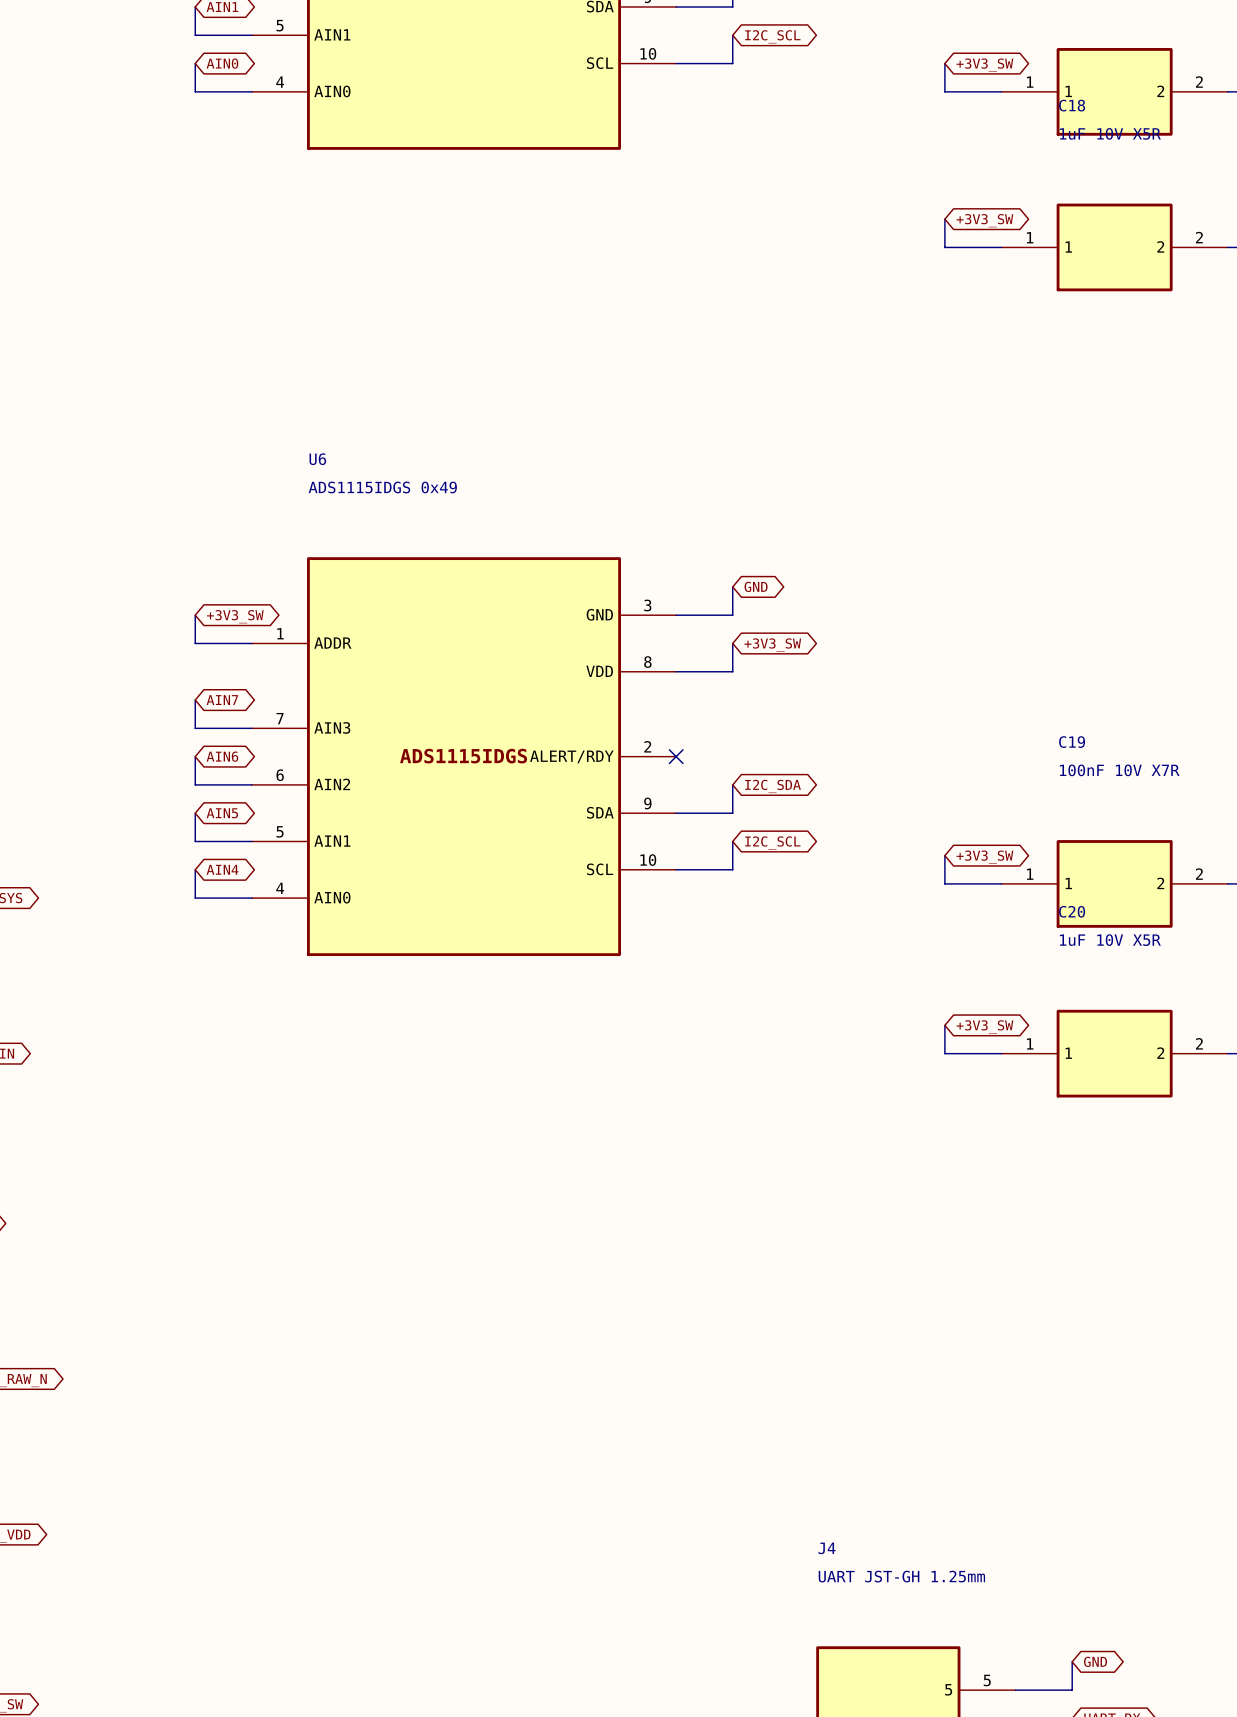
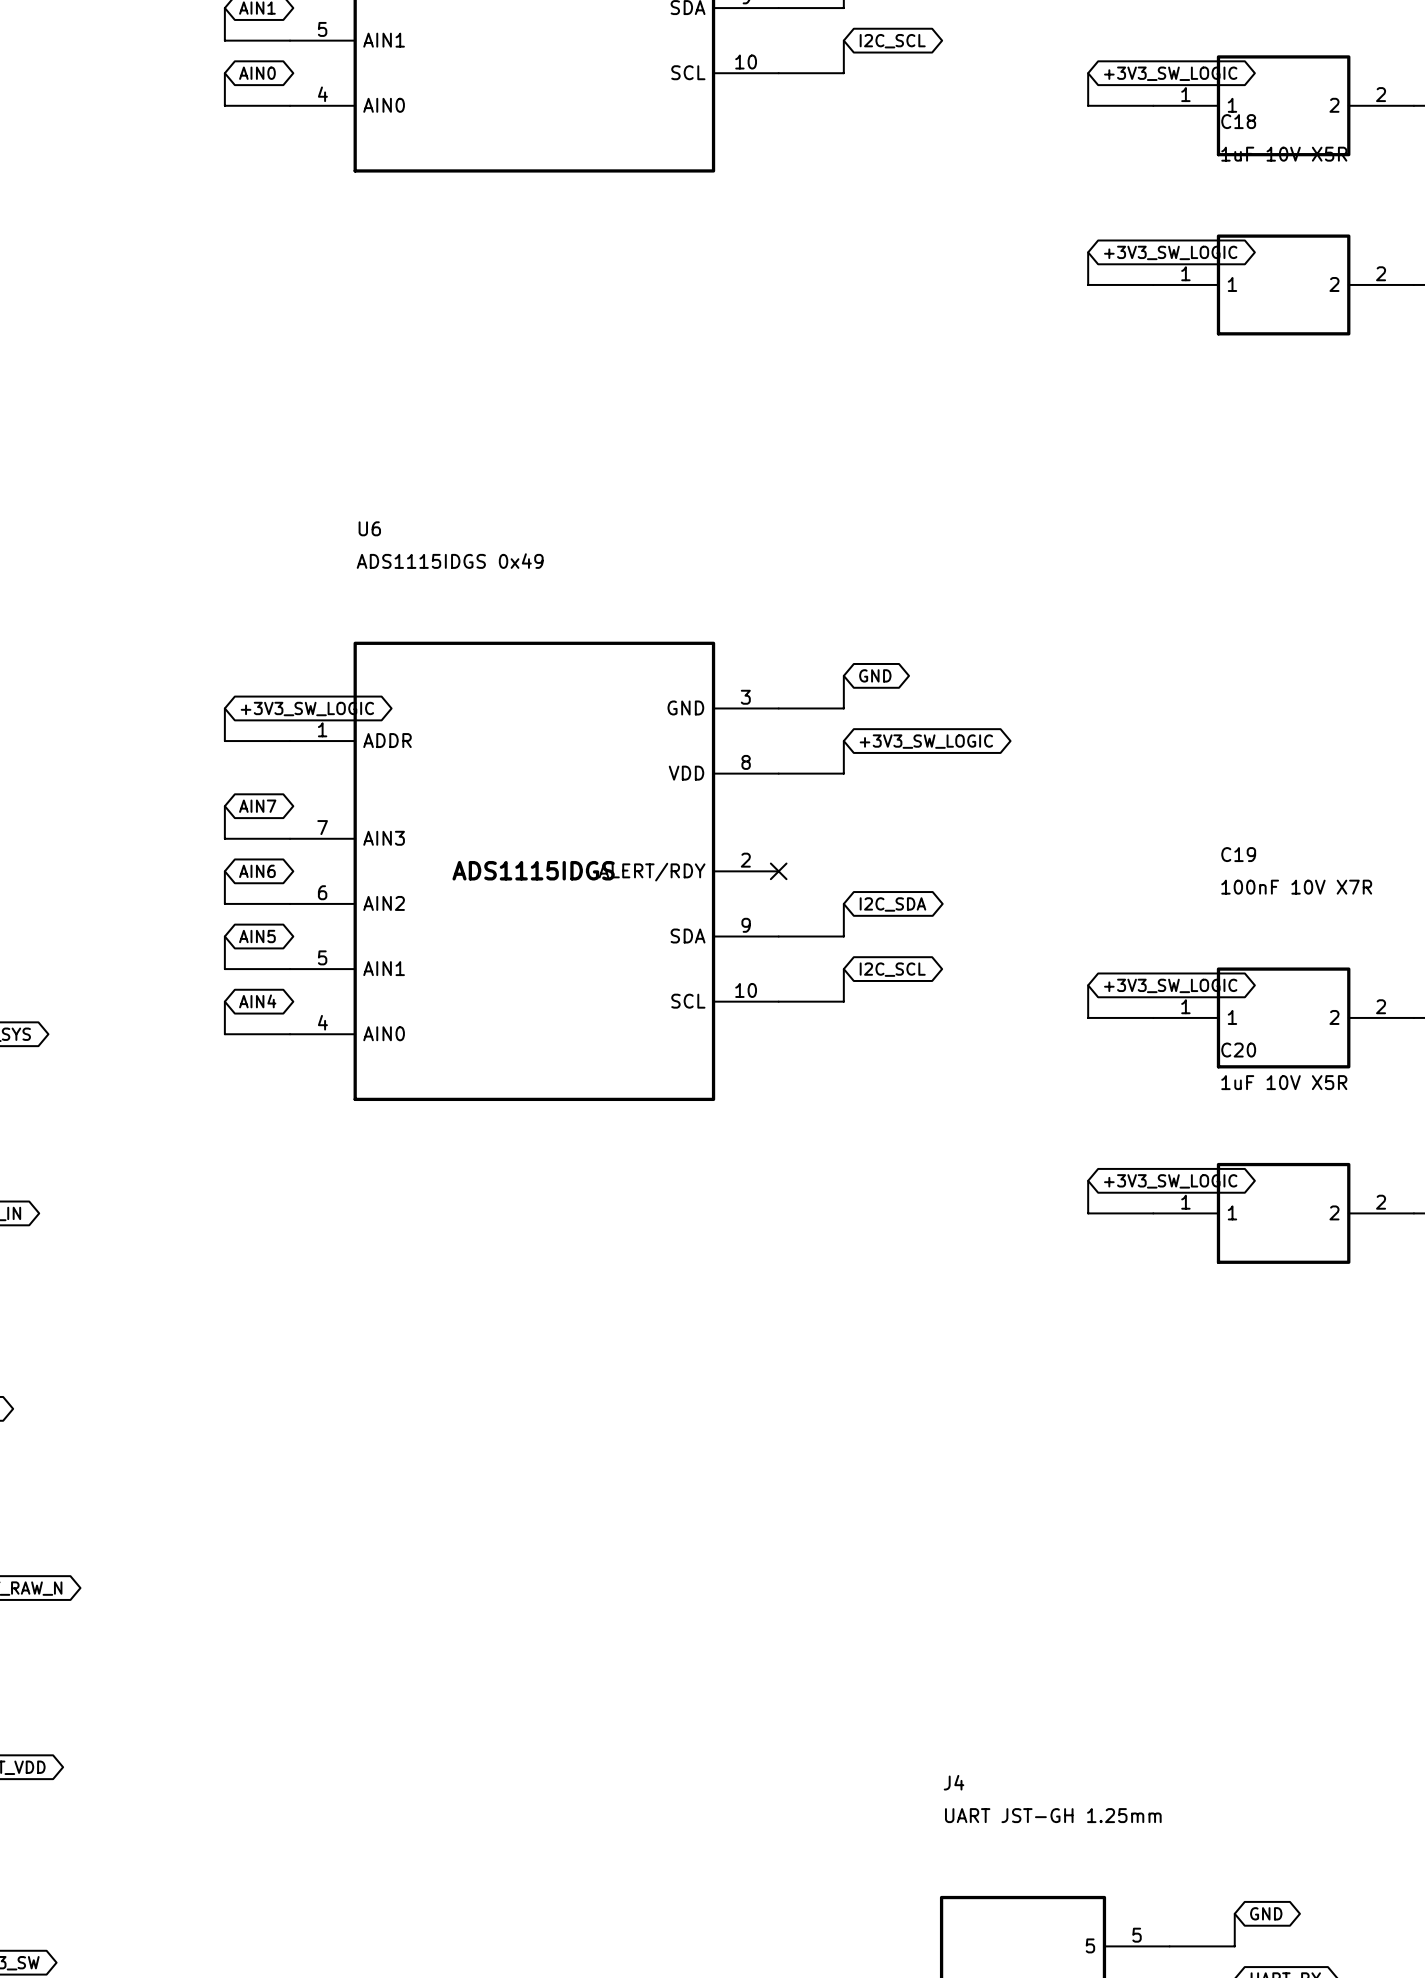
global label: +3V3_SW (984, 65) -> +3V3_SW_LOGIC (1170, 73)
global label: +3V3_SW (984, 220) -> +3V3_SW_LOGIC (1170, 252)
global label: +3V3_SW (235, 616) -> +3V3_SW_LOGIC (307, 709)
global label: +3V3_SW (772, 644) -> +3V3_SW_LOGIC (926, 741)
global label: +3V3_SW (984, 857) -> +3V3_SW_LOGIC (1170, 985)
global label: +3V3_SW (984, 1026) -> +3V3_SW_LOGIC (1170, 1181)

